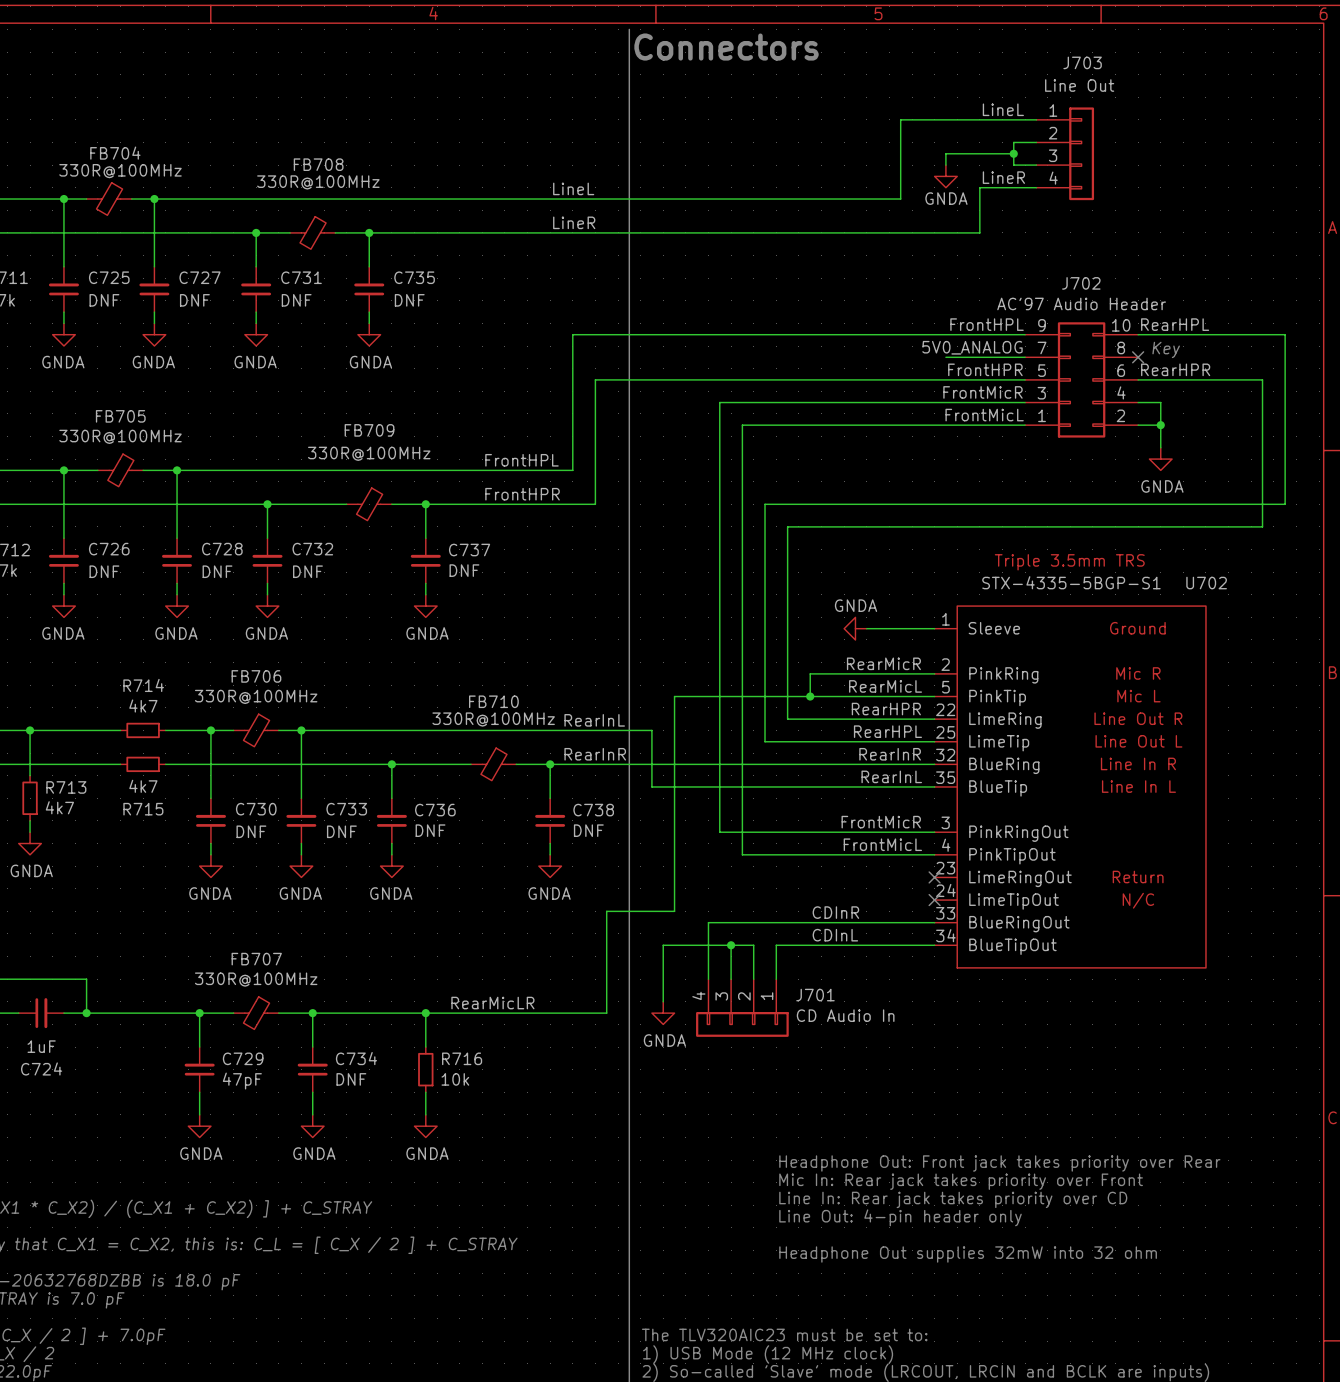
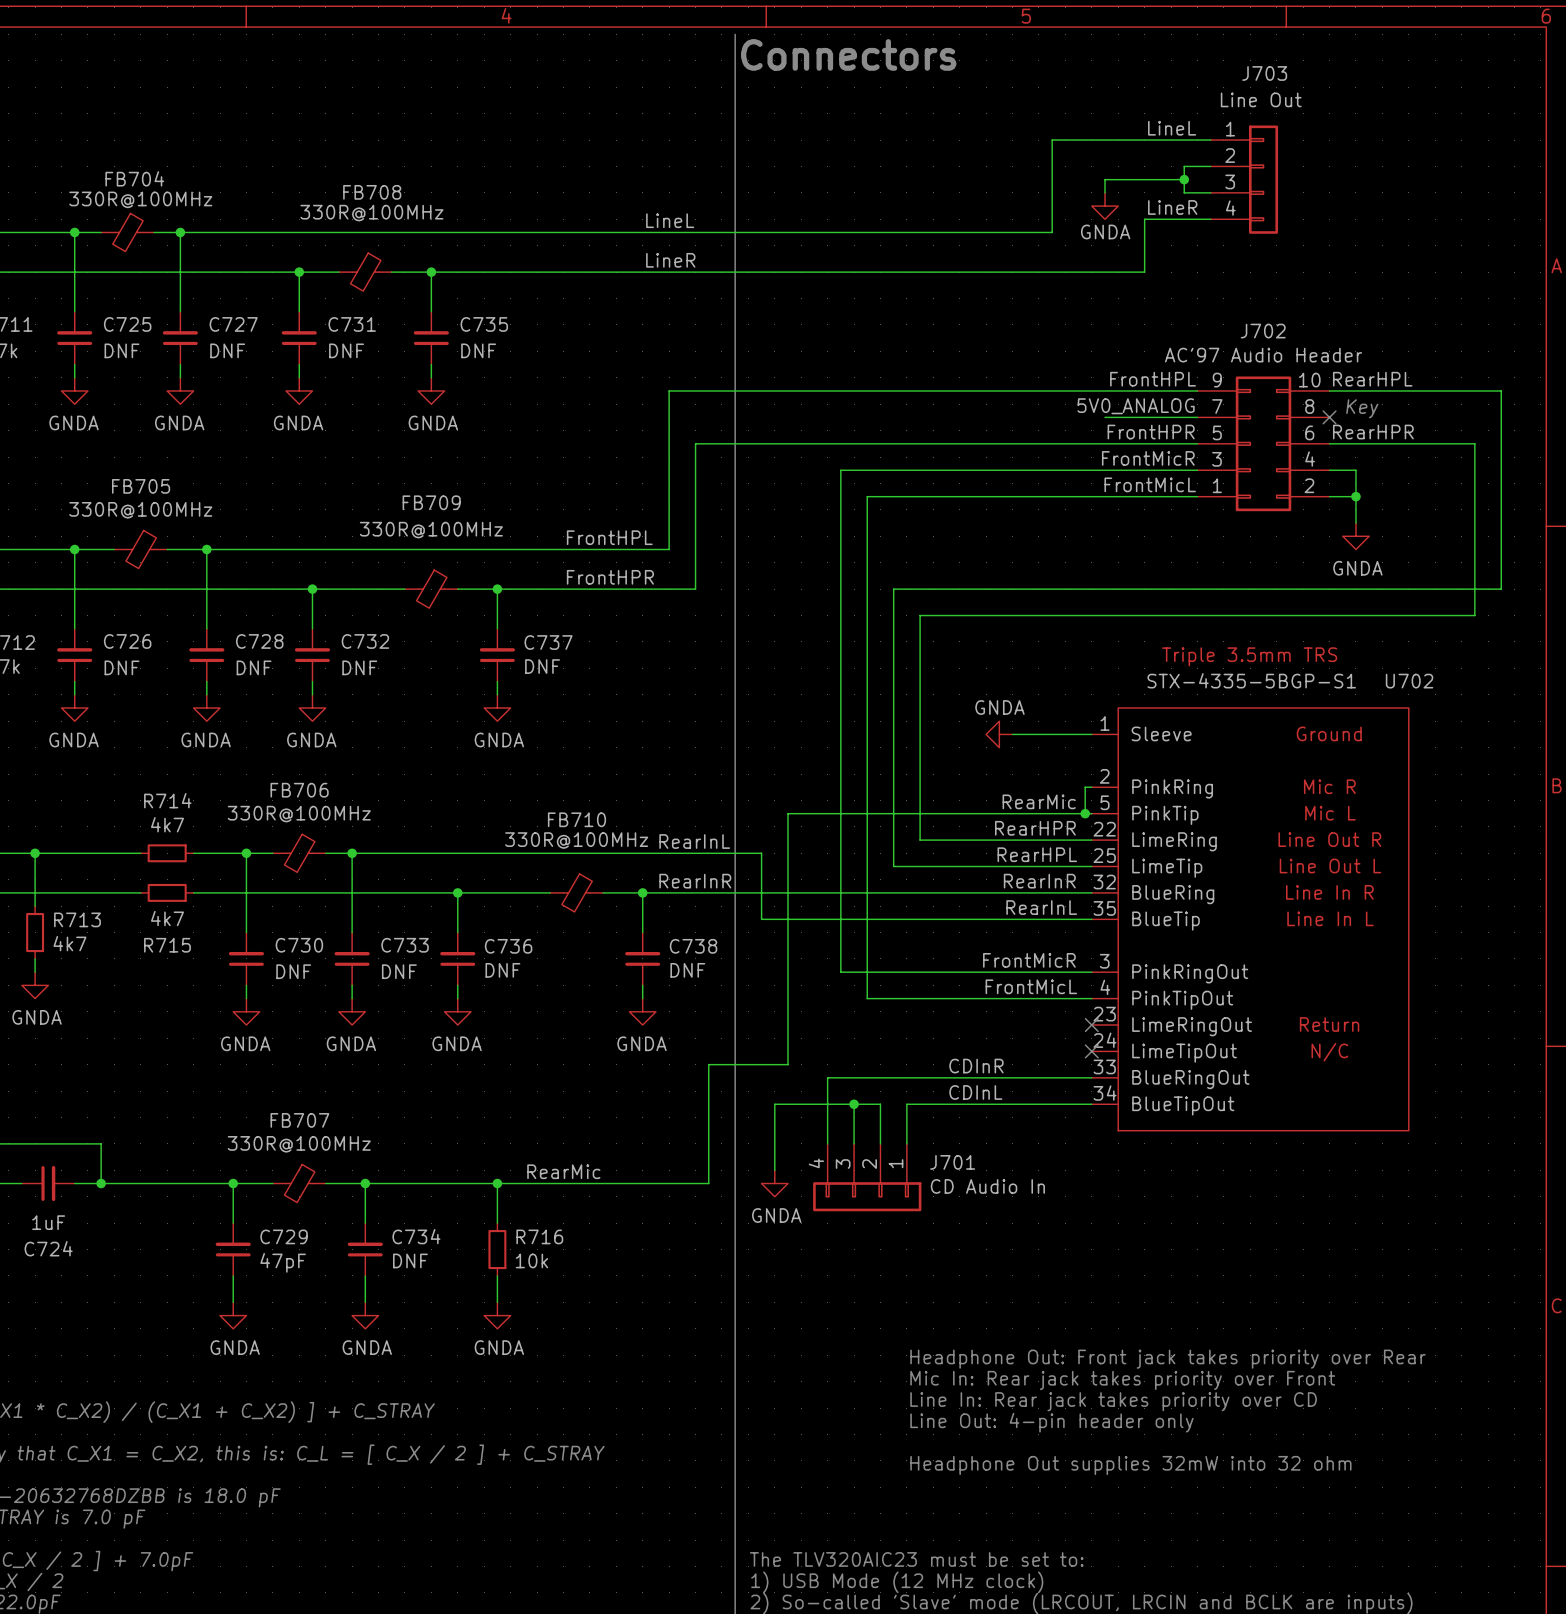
label: RearMicR (883, 663) -> none
wire: (928, 673) (810, 673) (810, 696) -> (1085, 787) (1085, 813)
label: RearMicL (885, 686) -> RearMic (1039, 801)
junction: (810, 696) -> none
junction: none -> (1085, 813)
label: RearMicLR (492, 1003) -> RearMic (563, 1171)

